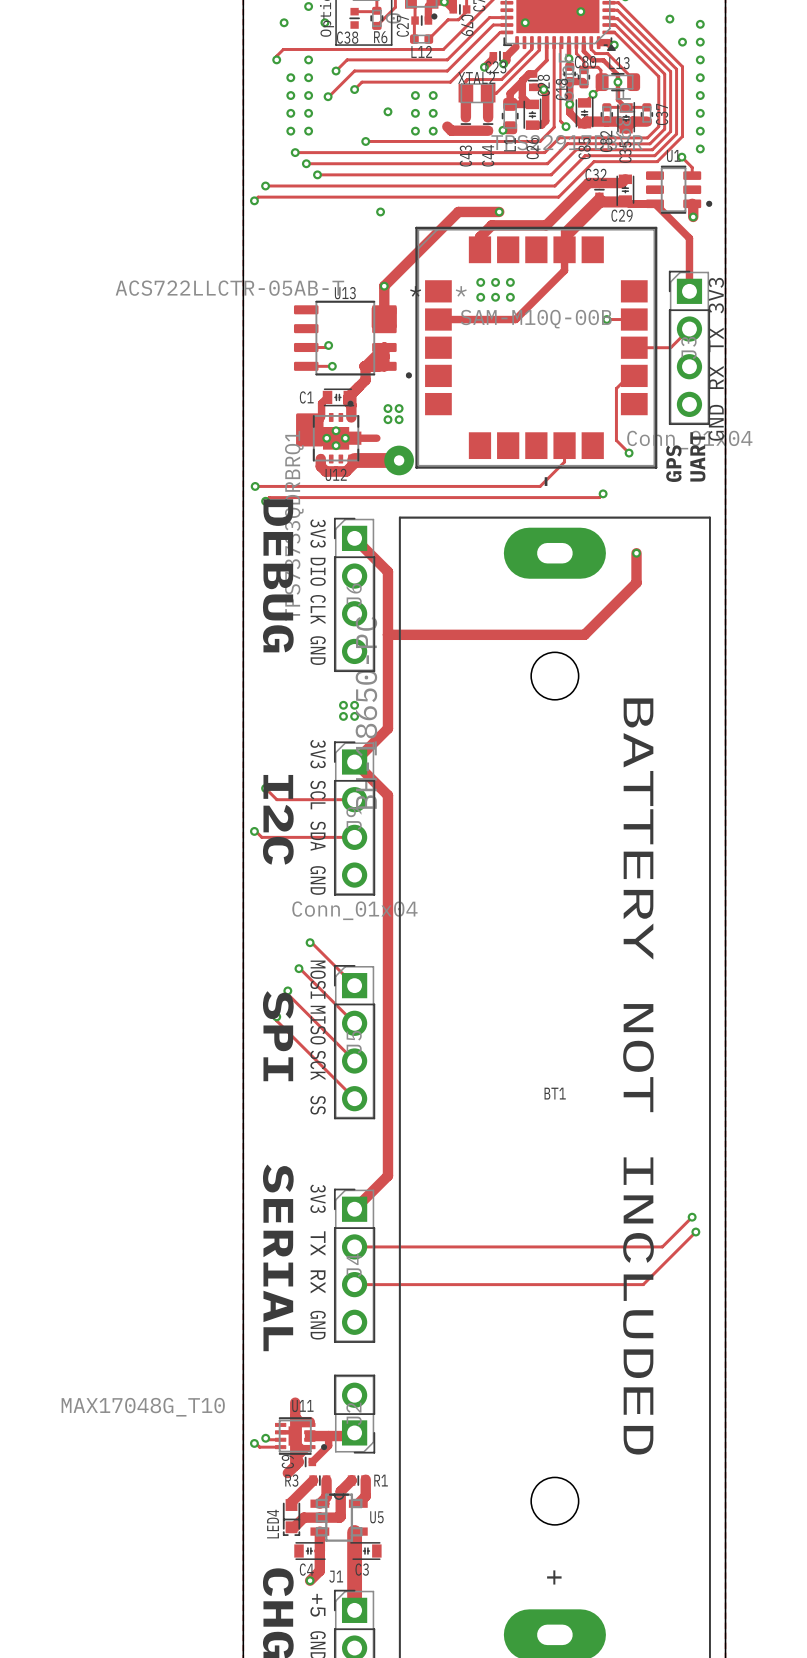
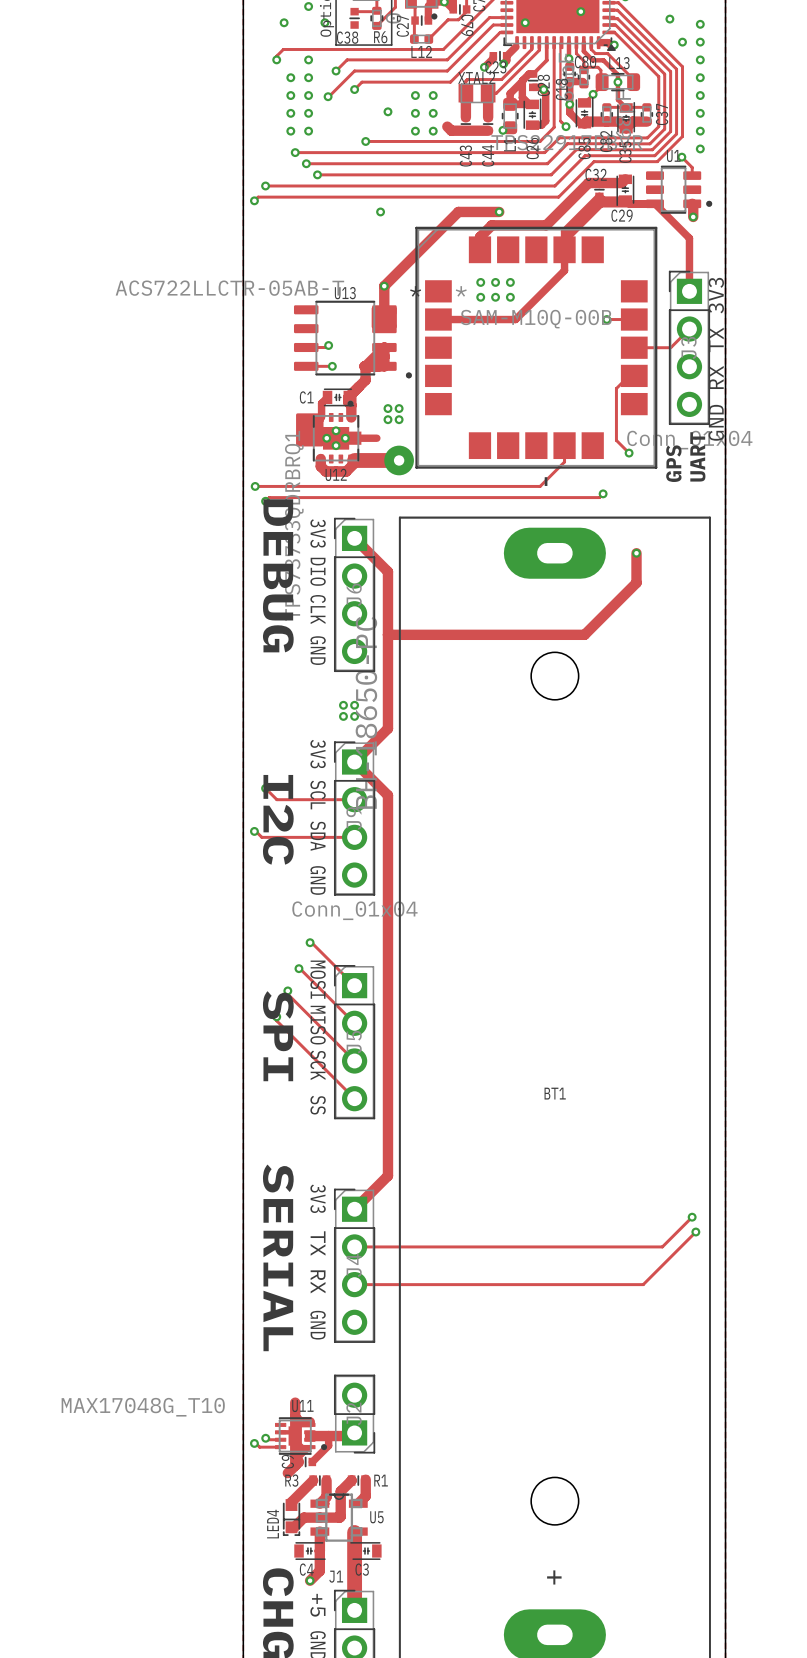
text: BATTERY NOT INCLUDED (638, 1076) -> none

